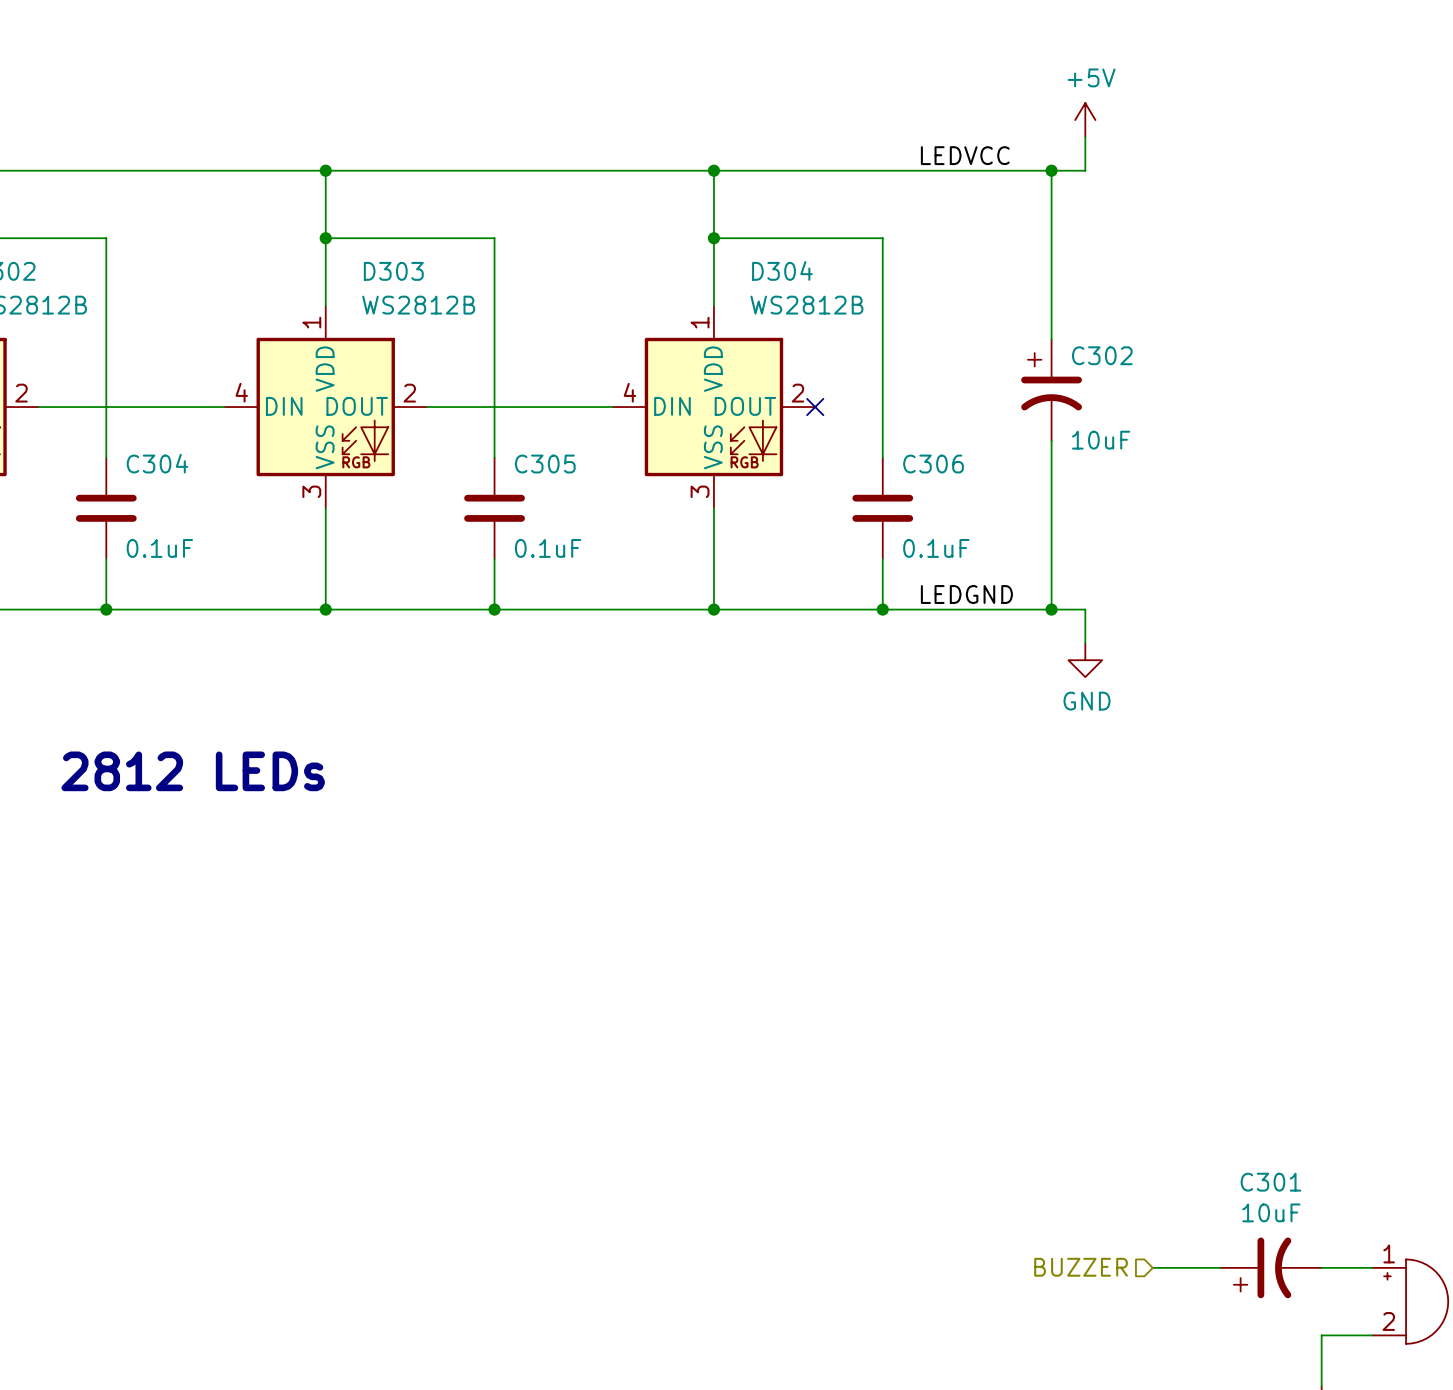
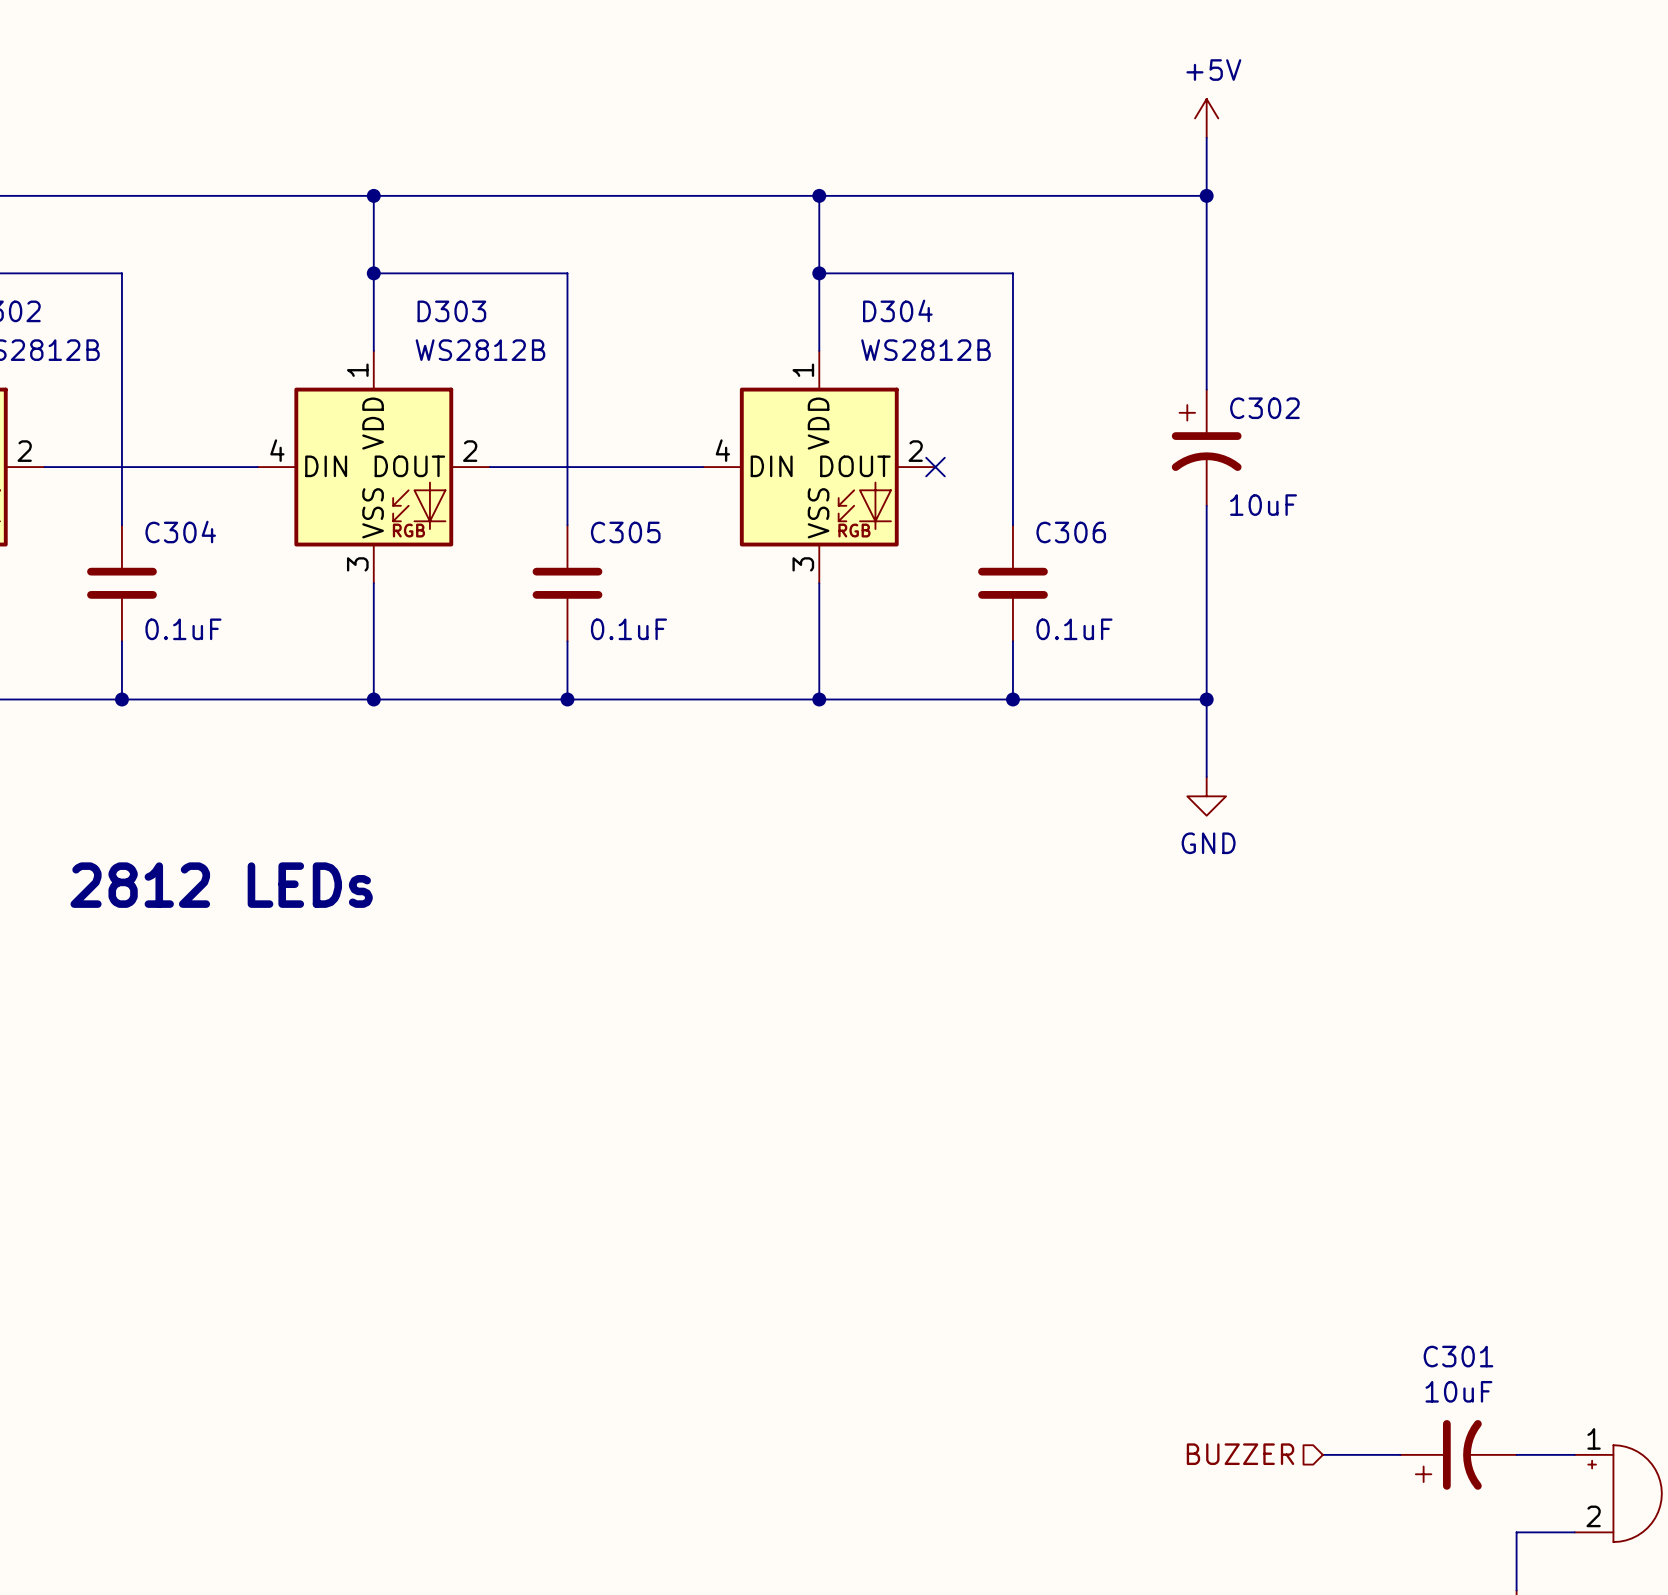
power symbol position: +5V (1085, 120) -> +5V (1206, 118)
wire: (1085, 136) (1085, 170) (1051, 170) -> (1206, 137) (1206, 195)
label: LEDVCC (965, 155) -> none
label: LEDGND (966, 594) -> none
wire: (1051, 609) (1085, 609) (1085, 643) -> (1206, 699) (1206, 776)
power symbol position: GND (1085, 660) -> GND (1206, 796)

